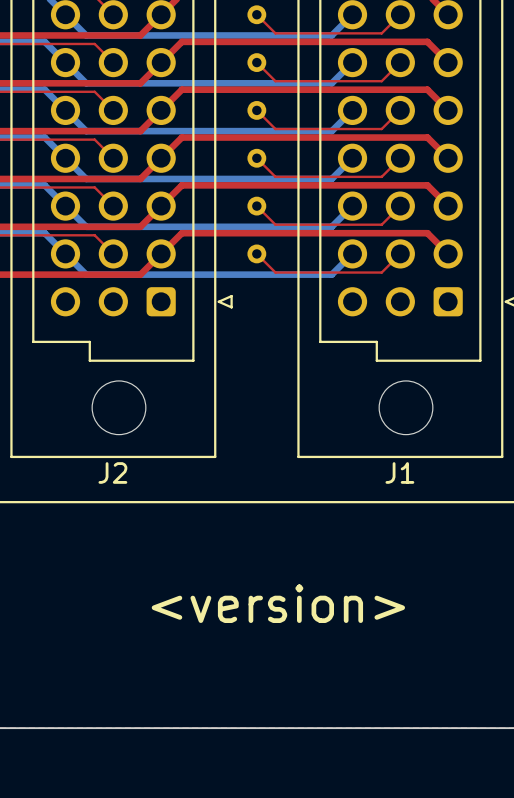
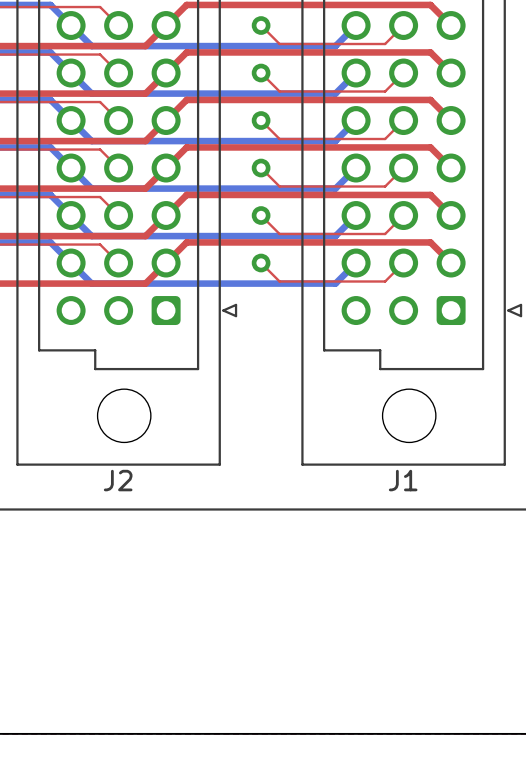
text: <version> (278, 603) -> none

